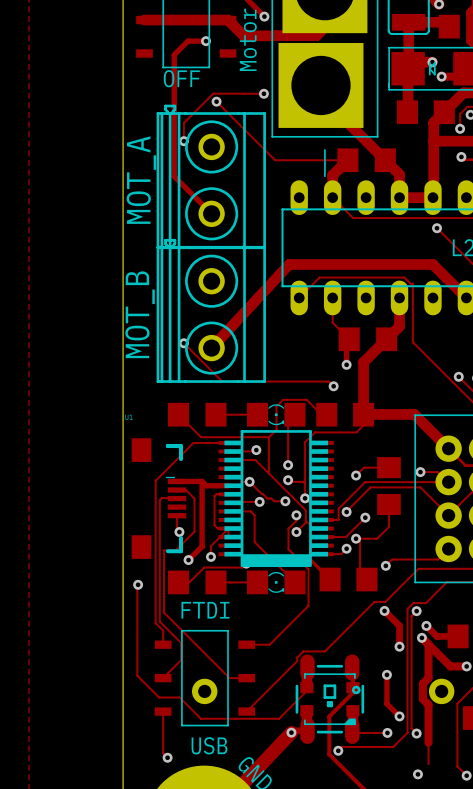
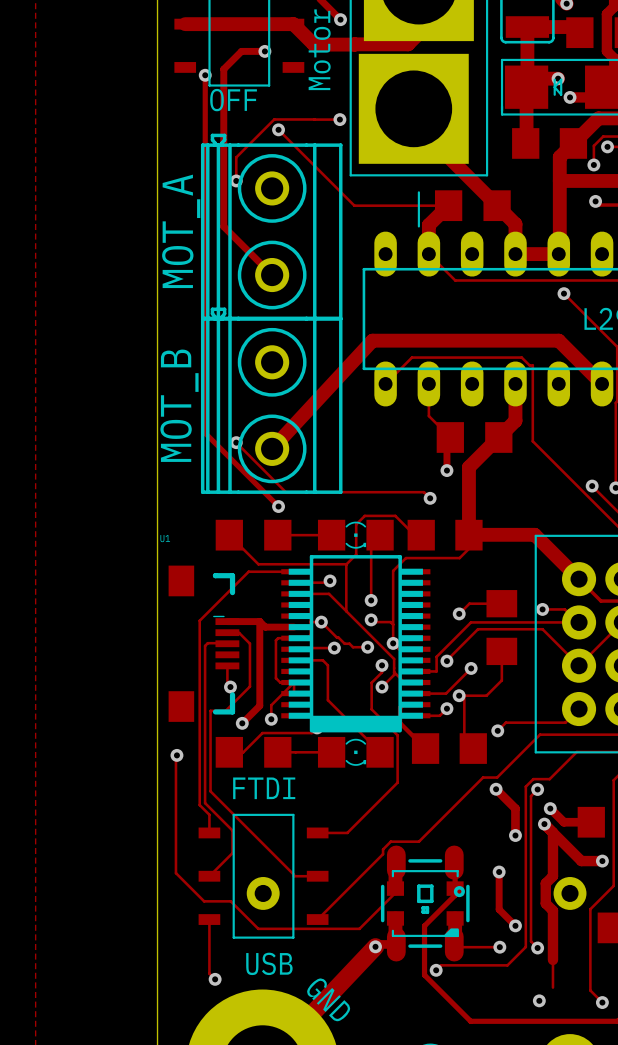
track: none -> (205, 75) (205, 433) (278, 506)
via: none -> (205, 75)
via: none -> (278, 506)

